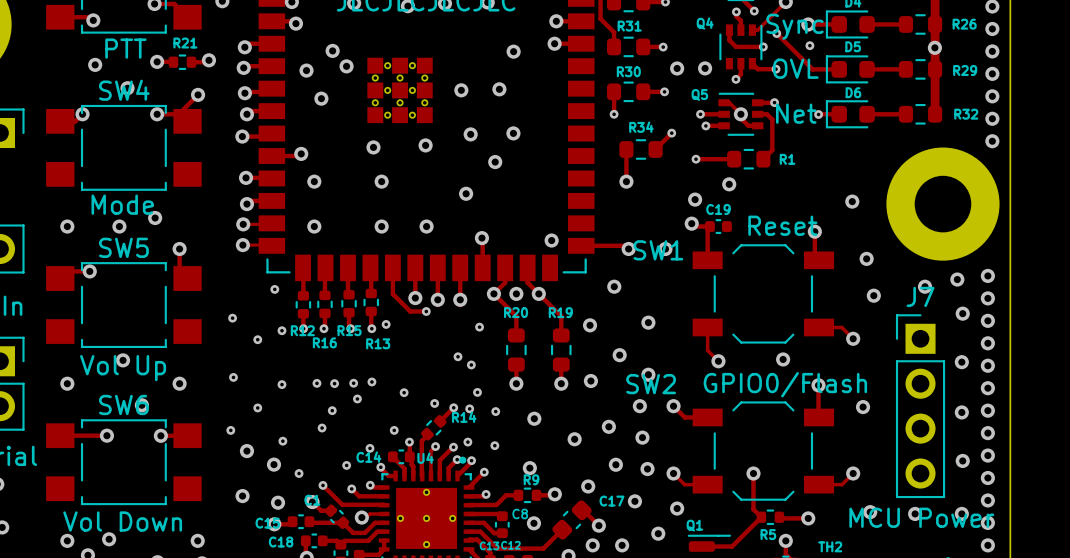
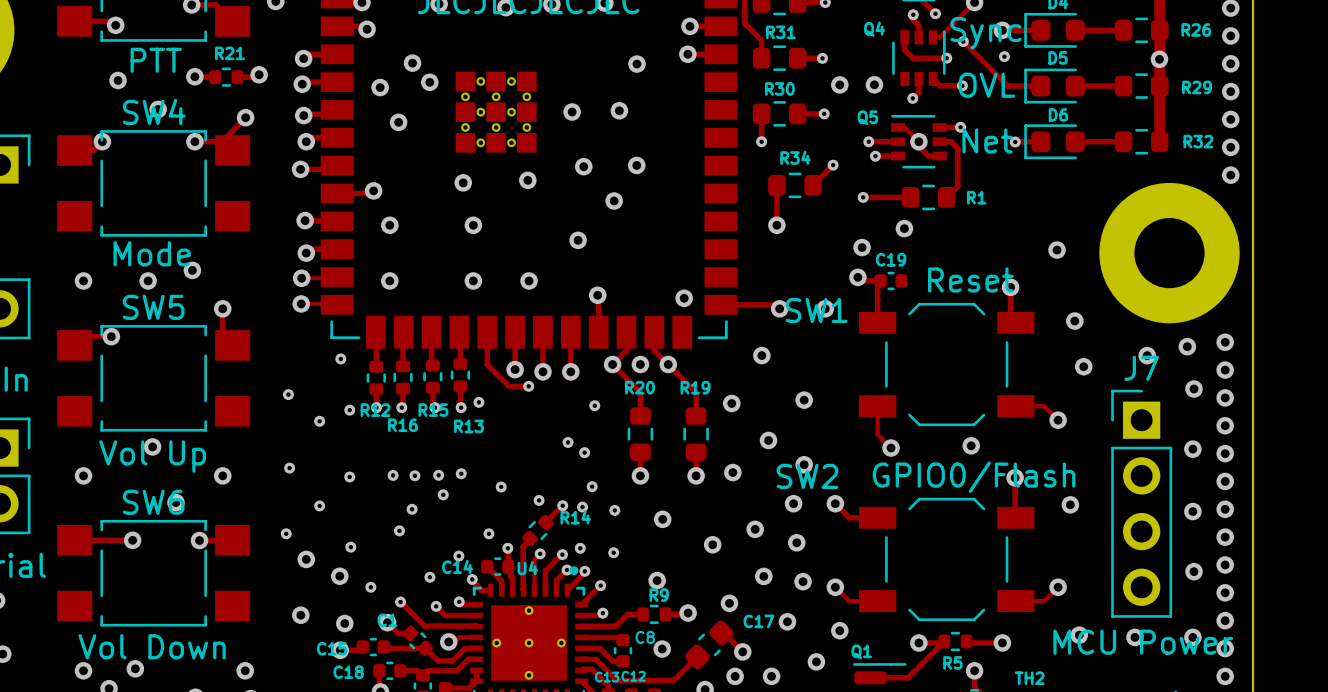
track: (753, 473) (753, 509) (761, 517) -> none
via position: (753, 473) -> (918, 642)
track: none -> (918, 642) (942, 642)

